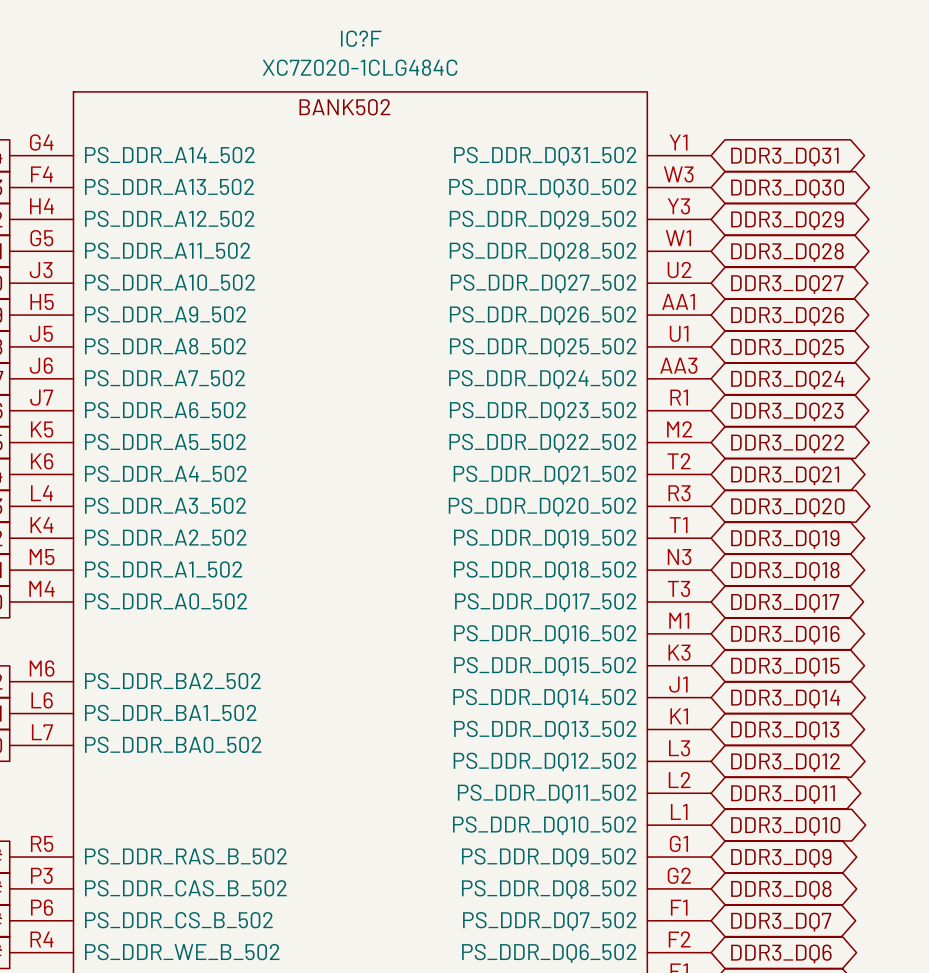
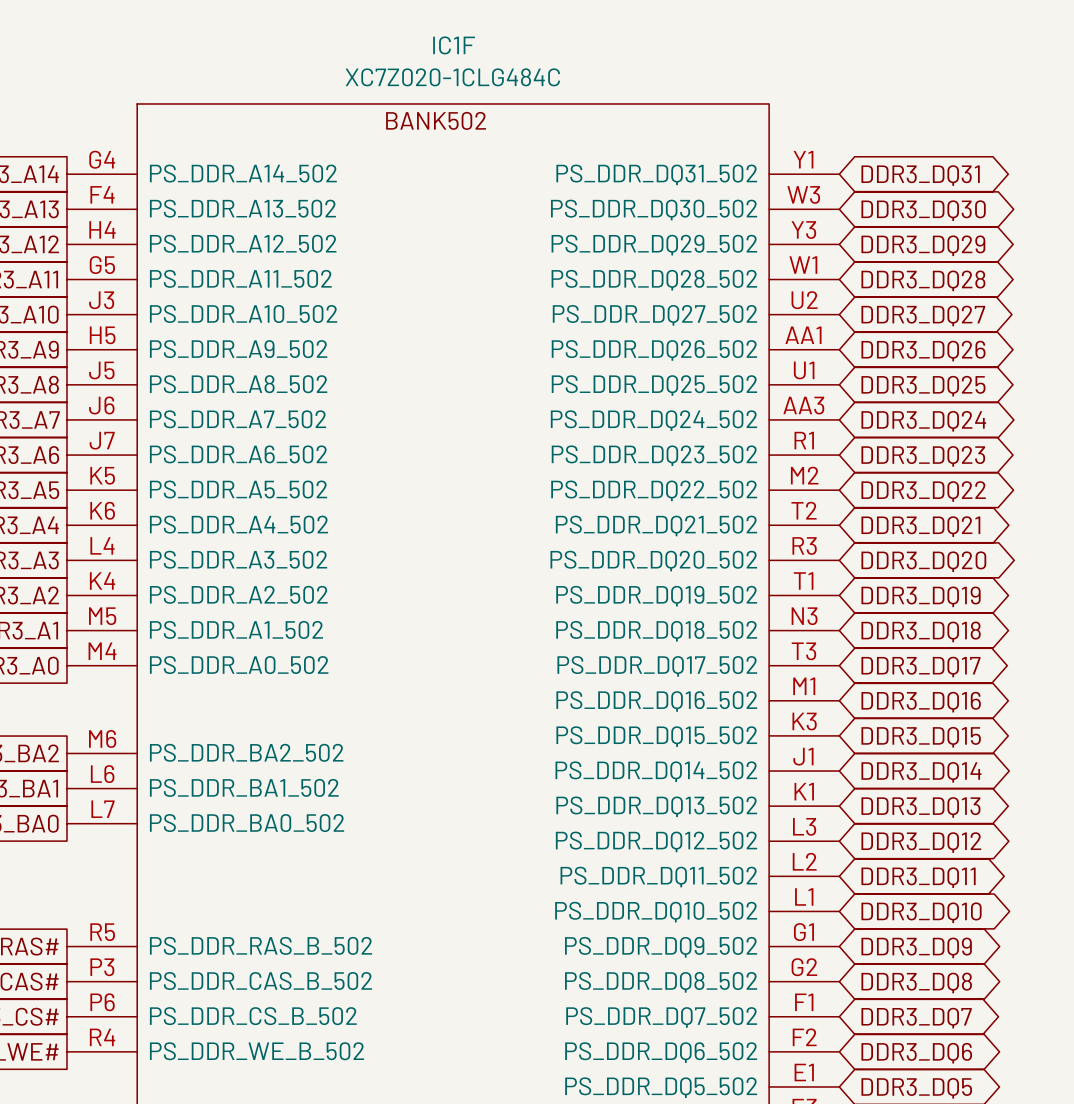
IC?F name: IC?F (361, 38) -> IC1F (454, 45)

